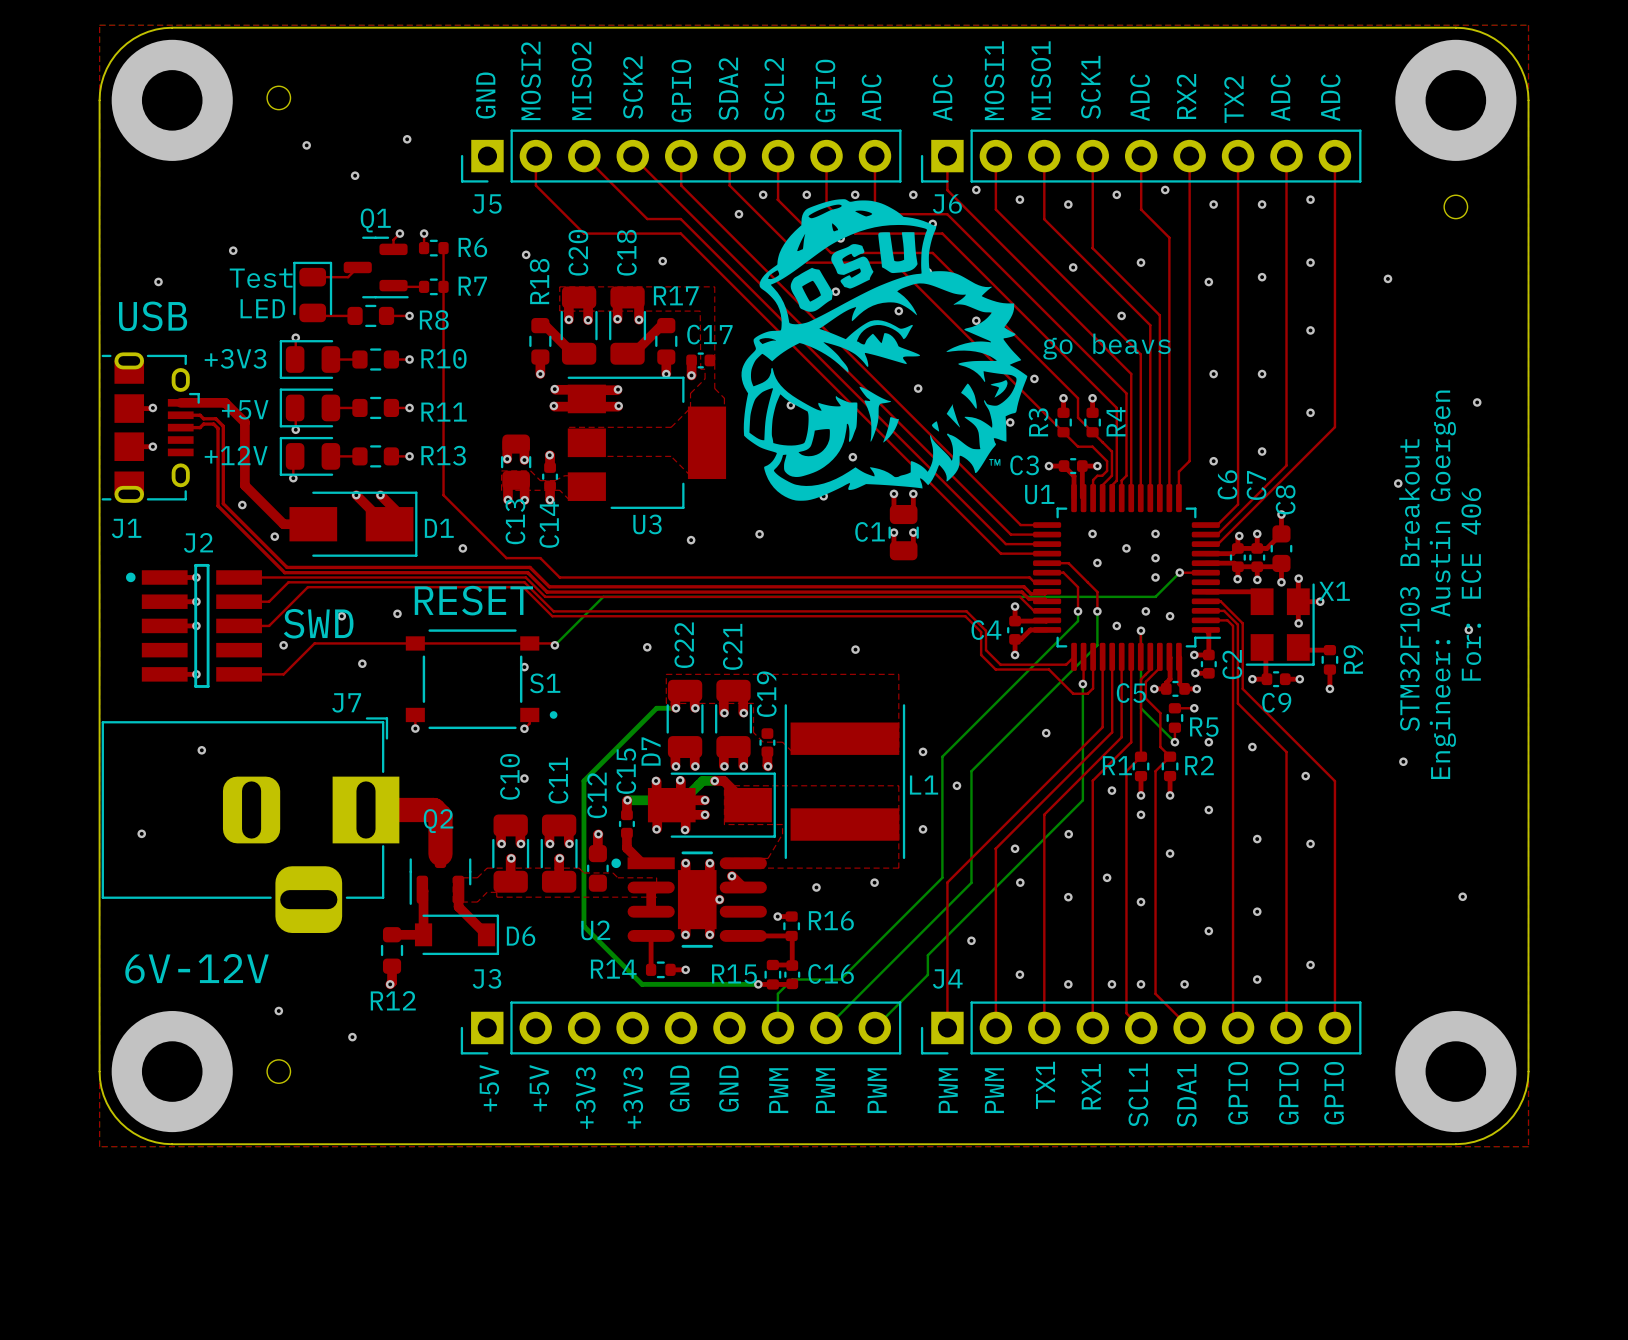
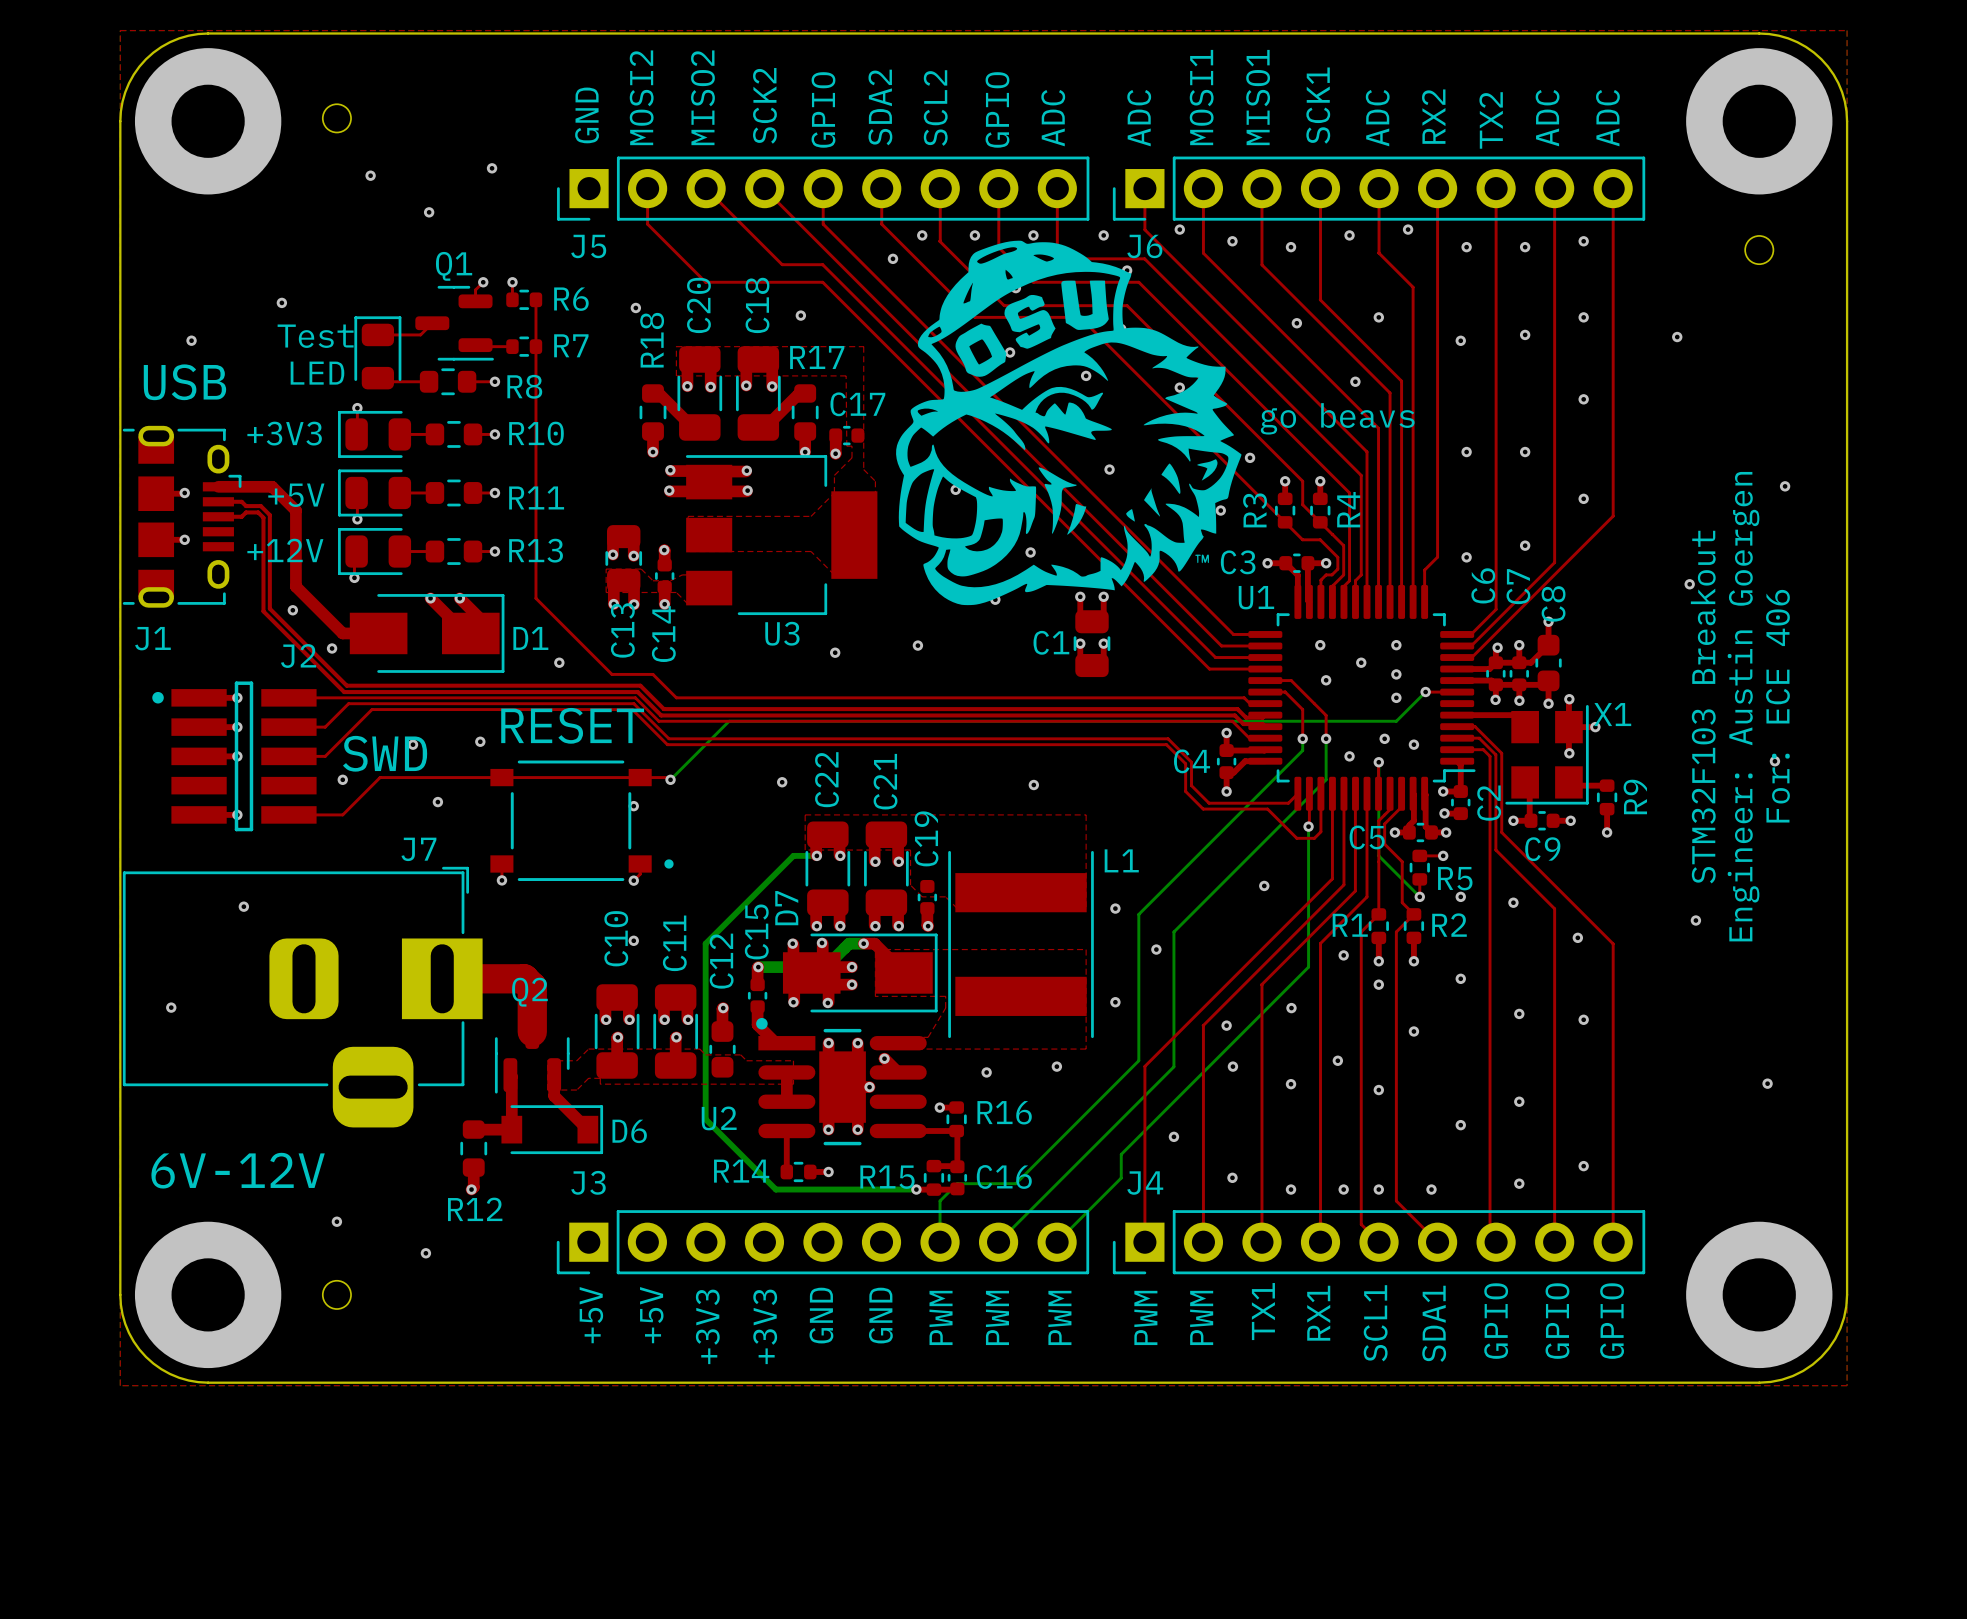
J2 name position: J2 (198, 542) -> J2 (298, 656)
S1 name: S1 (545, 683) -> none
L1 name position: L1 (924, 785) -> L1 (1121, 860)
U2 footprint: [611, 851, 767, 948] -> [756, 1017, 927, 1146]

